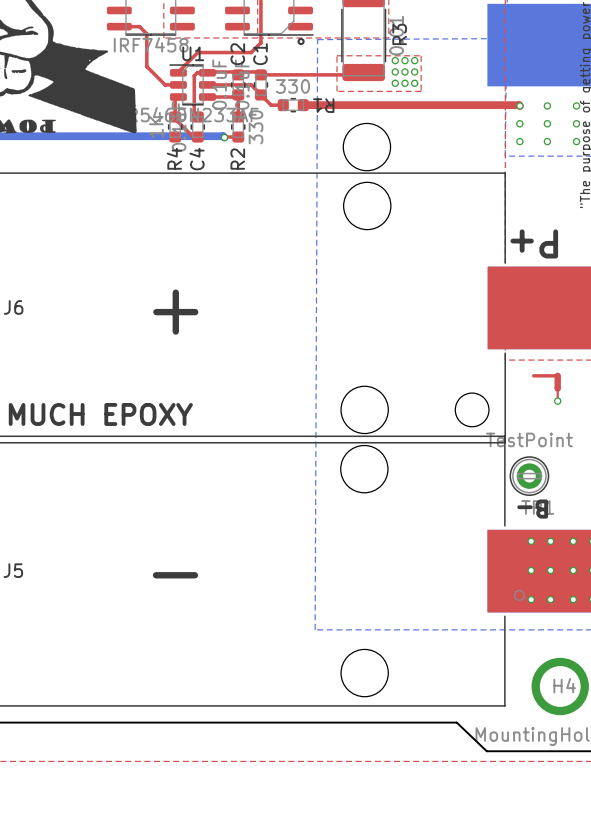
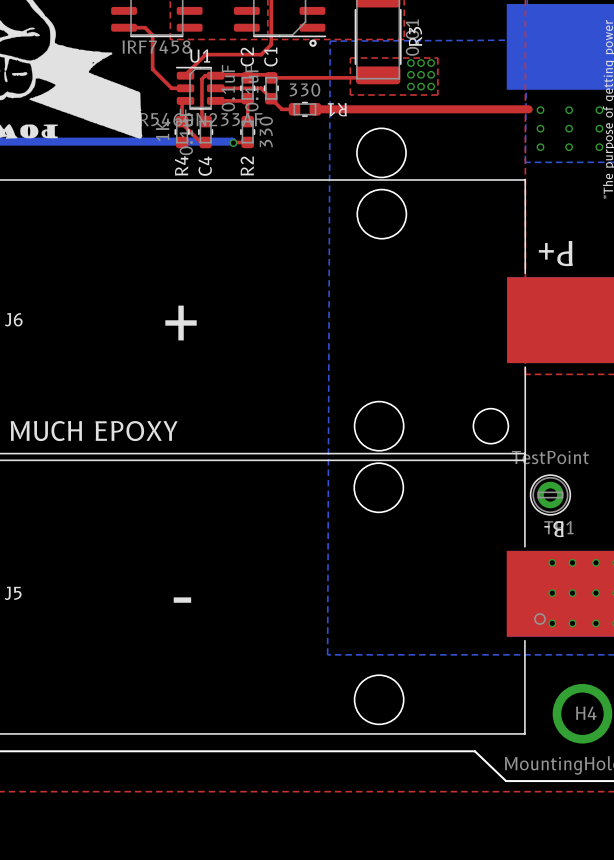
top track: (508, 105) (519, 105) -> none
top track: (533, 375) (557, 375) -> none
part: (557, 382) -> none
top track: (557, 388) (557, 401) -> none
via: (557, 401) -> none

